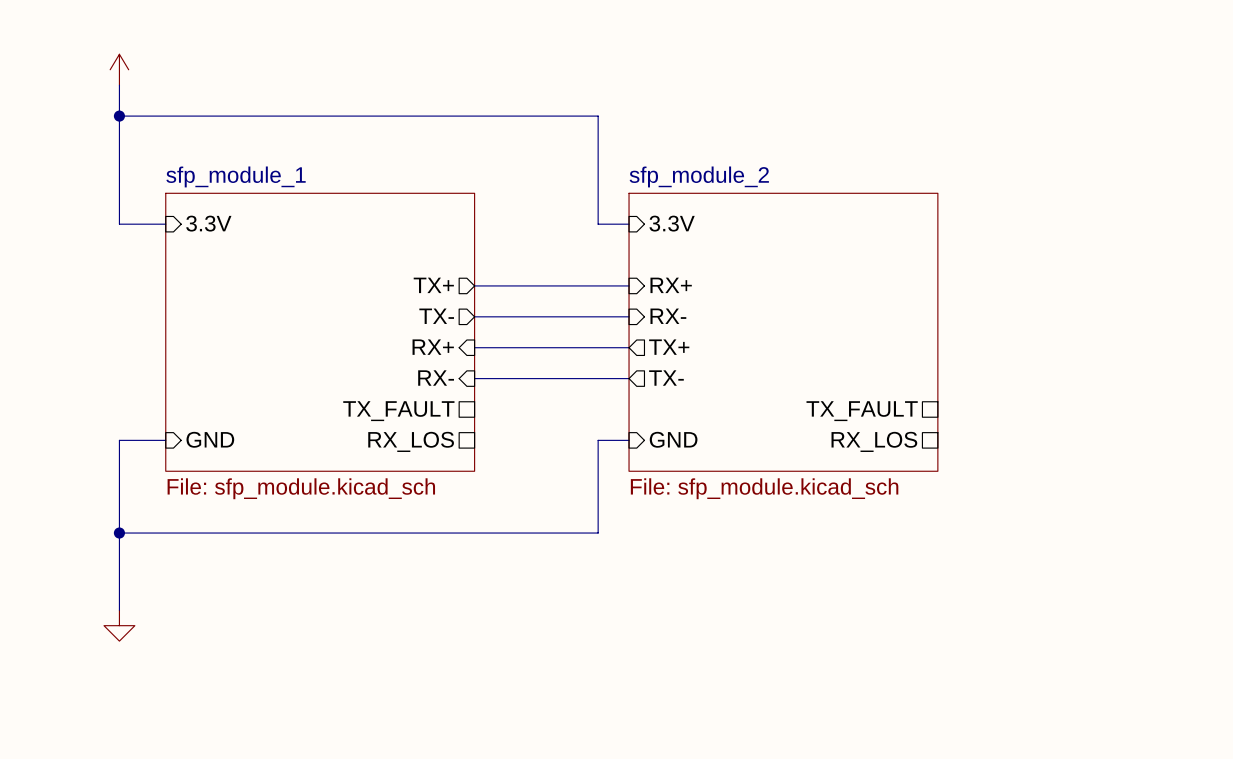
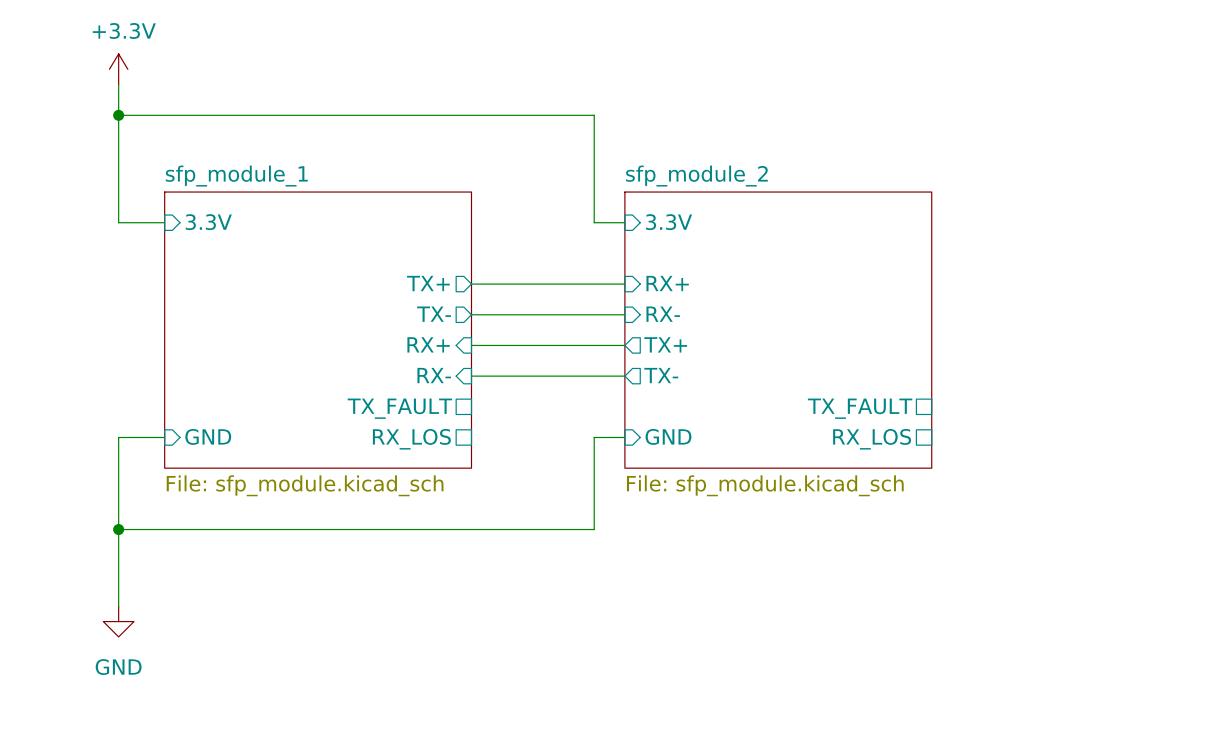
power symbol text: none -> +3.3V (124, 31)
power symbol text: none -> GND (118, 667)

